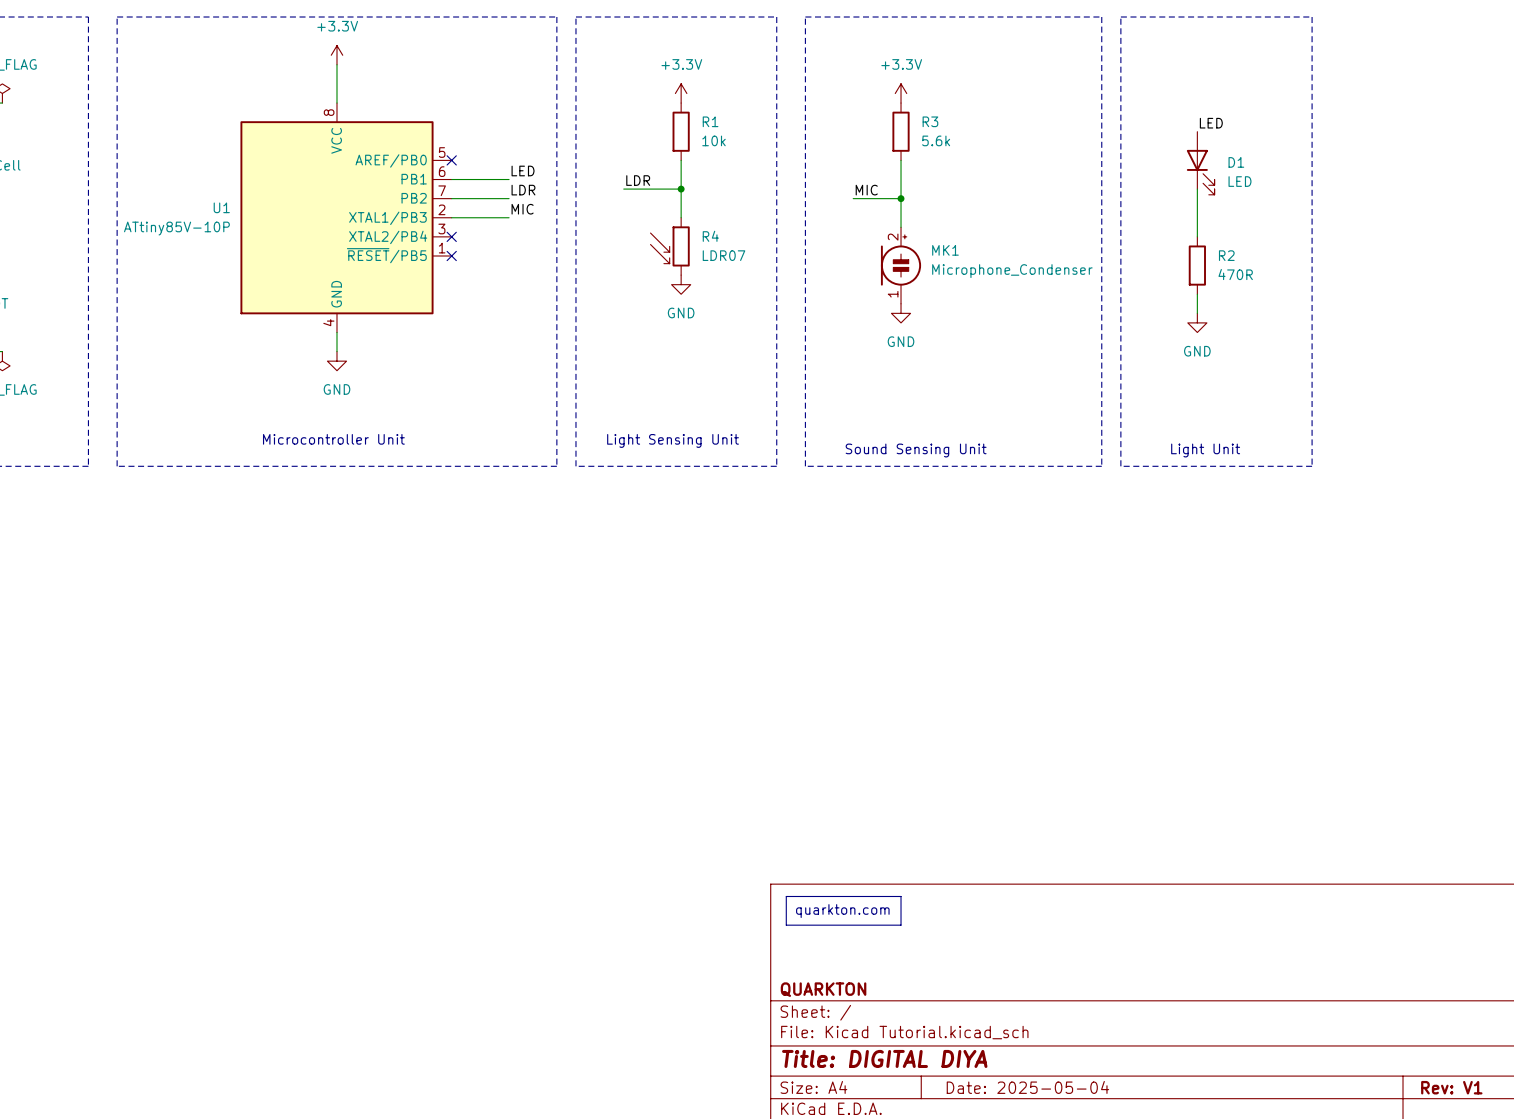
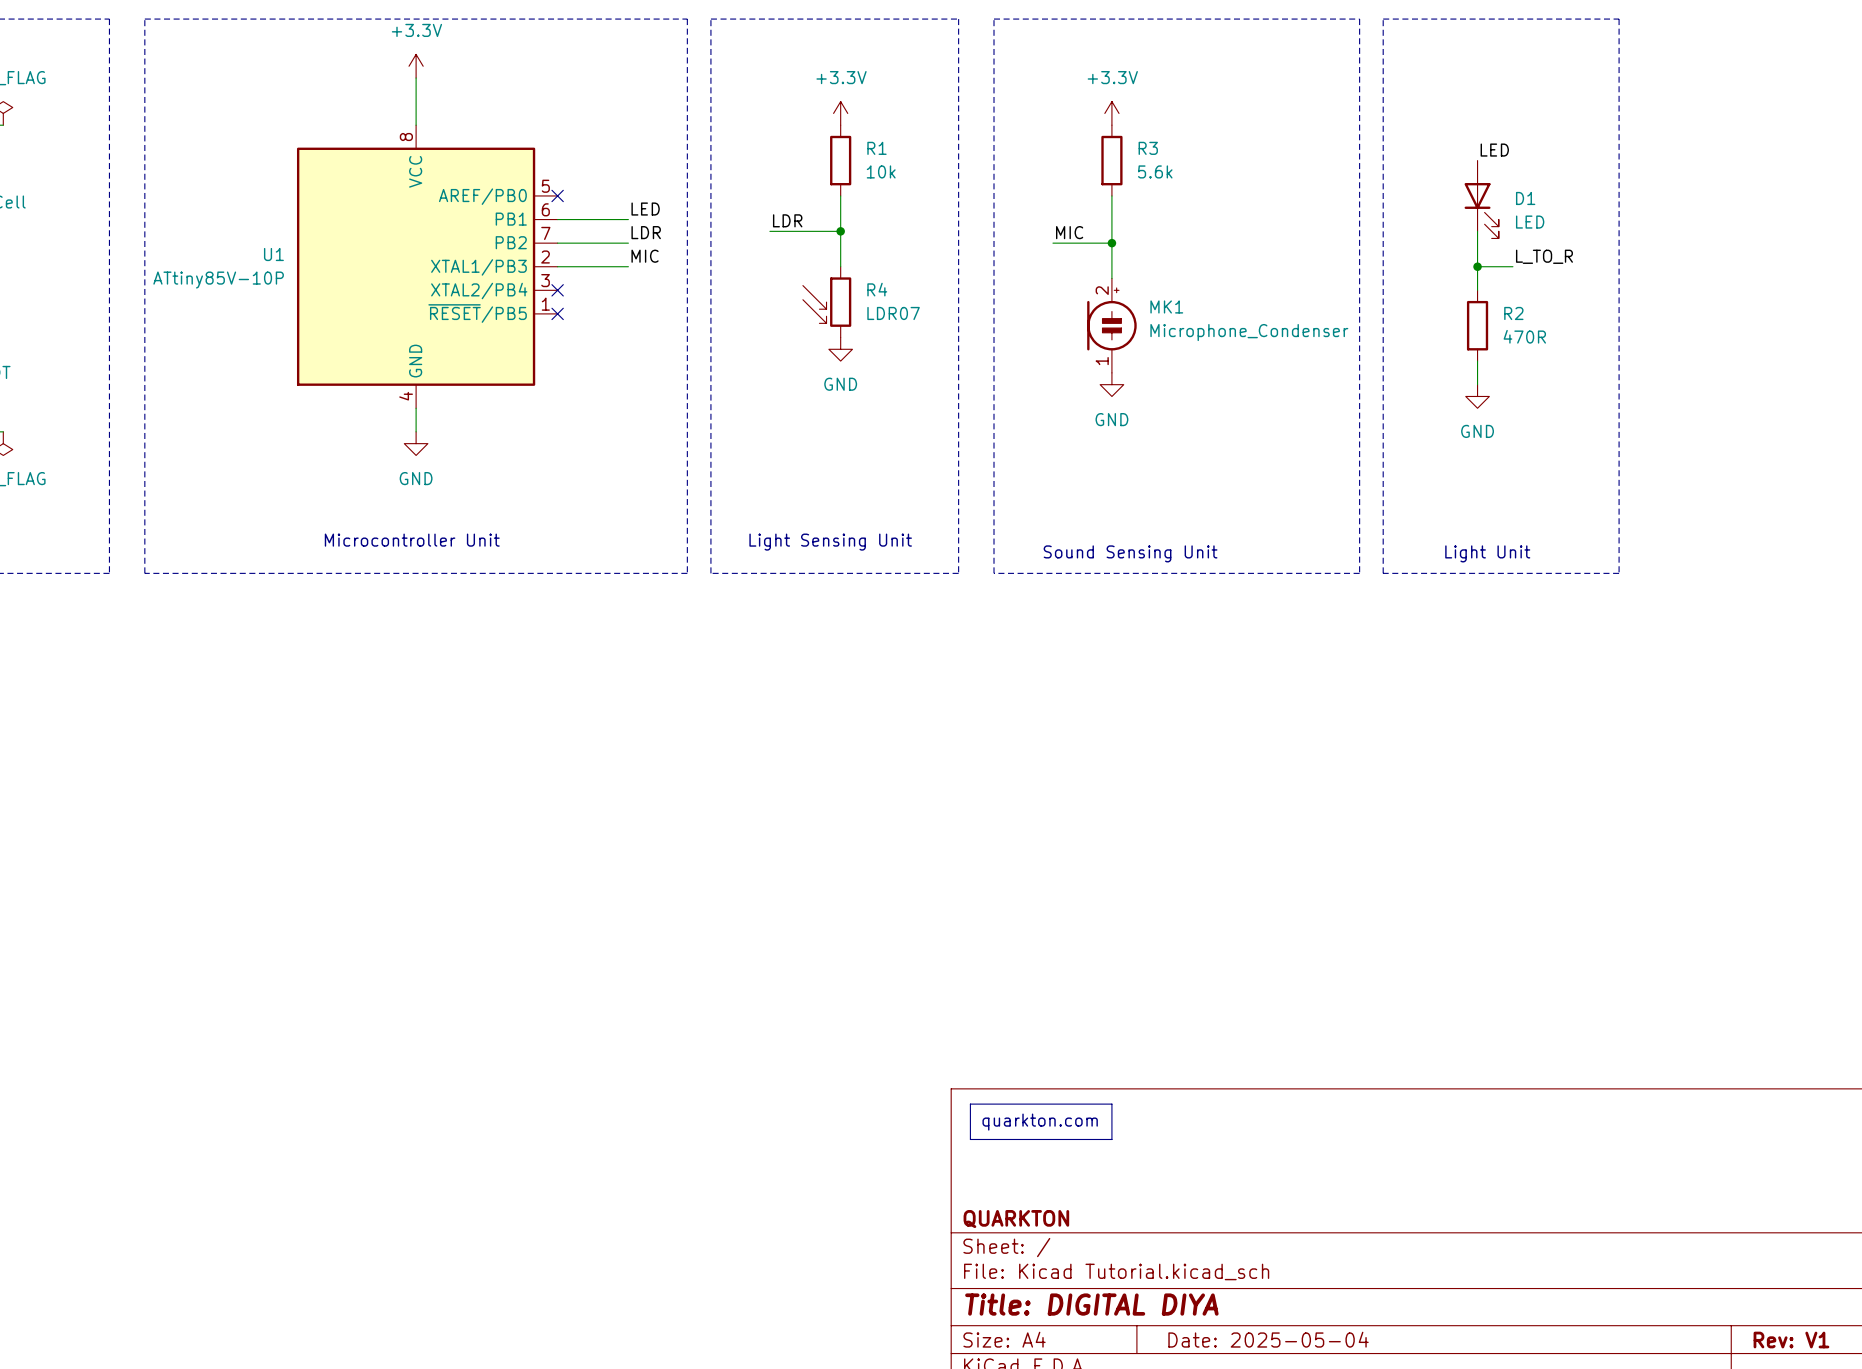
label: none -> L_TO_R (1544, 256)
wire: none -> (1477, 266) (1512, 266)
junction: none -> (1477, 266)

